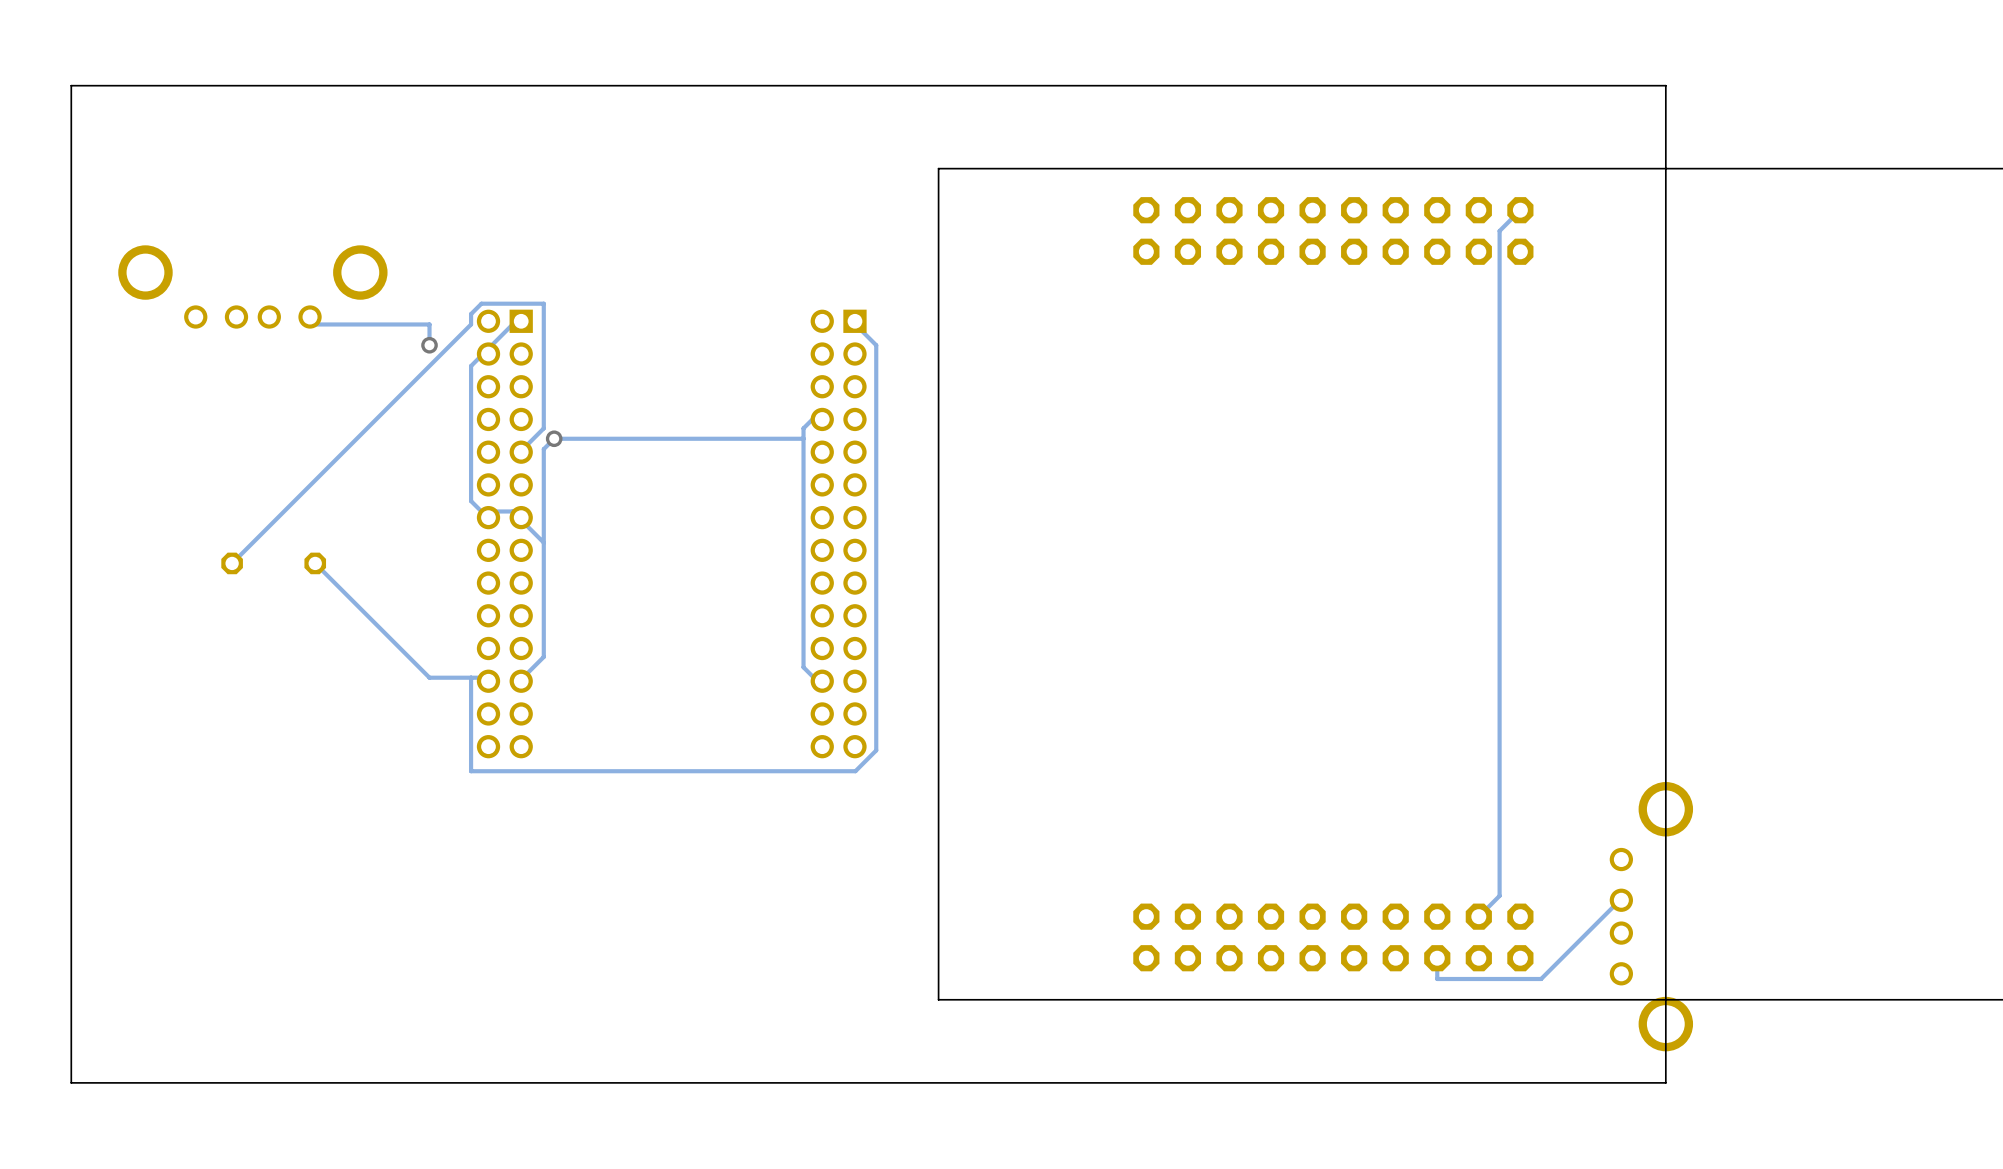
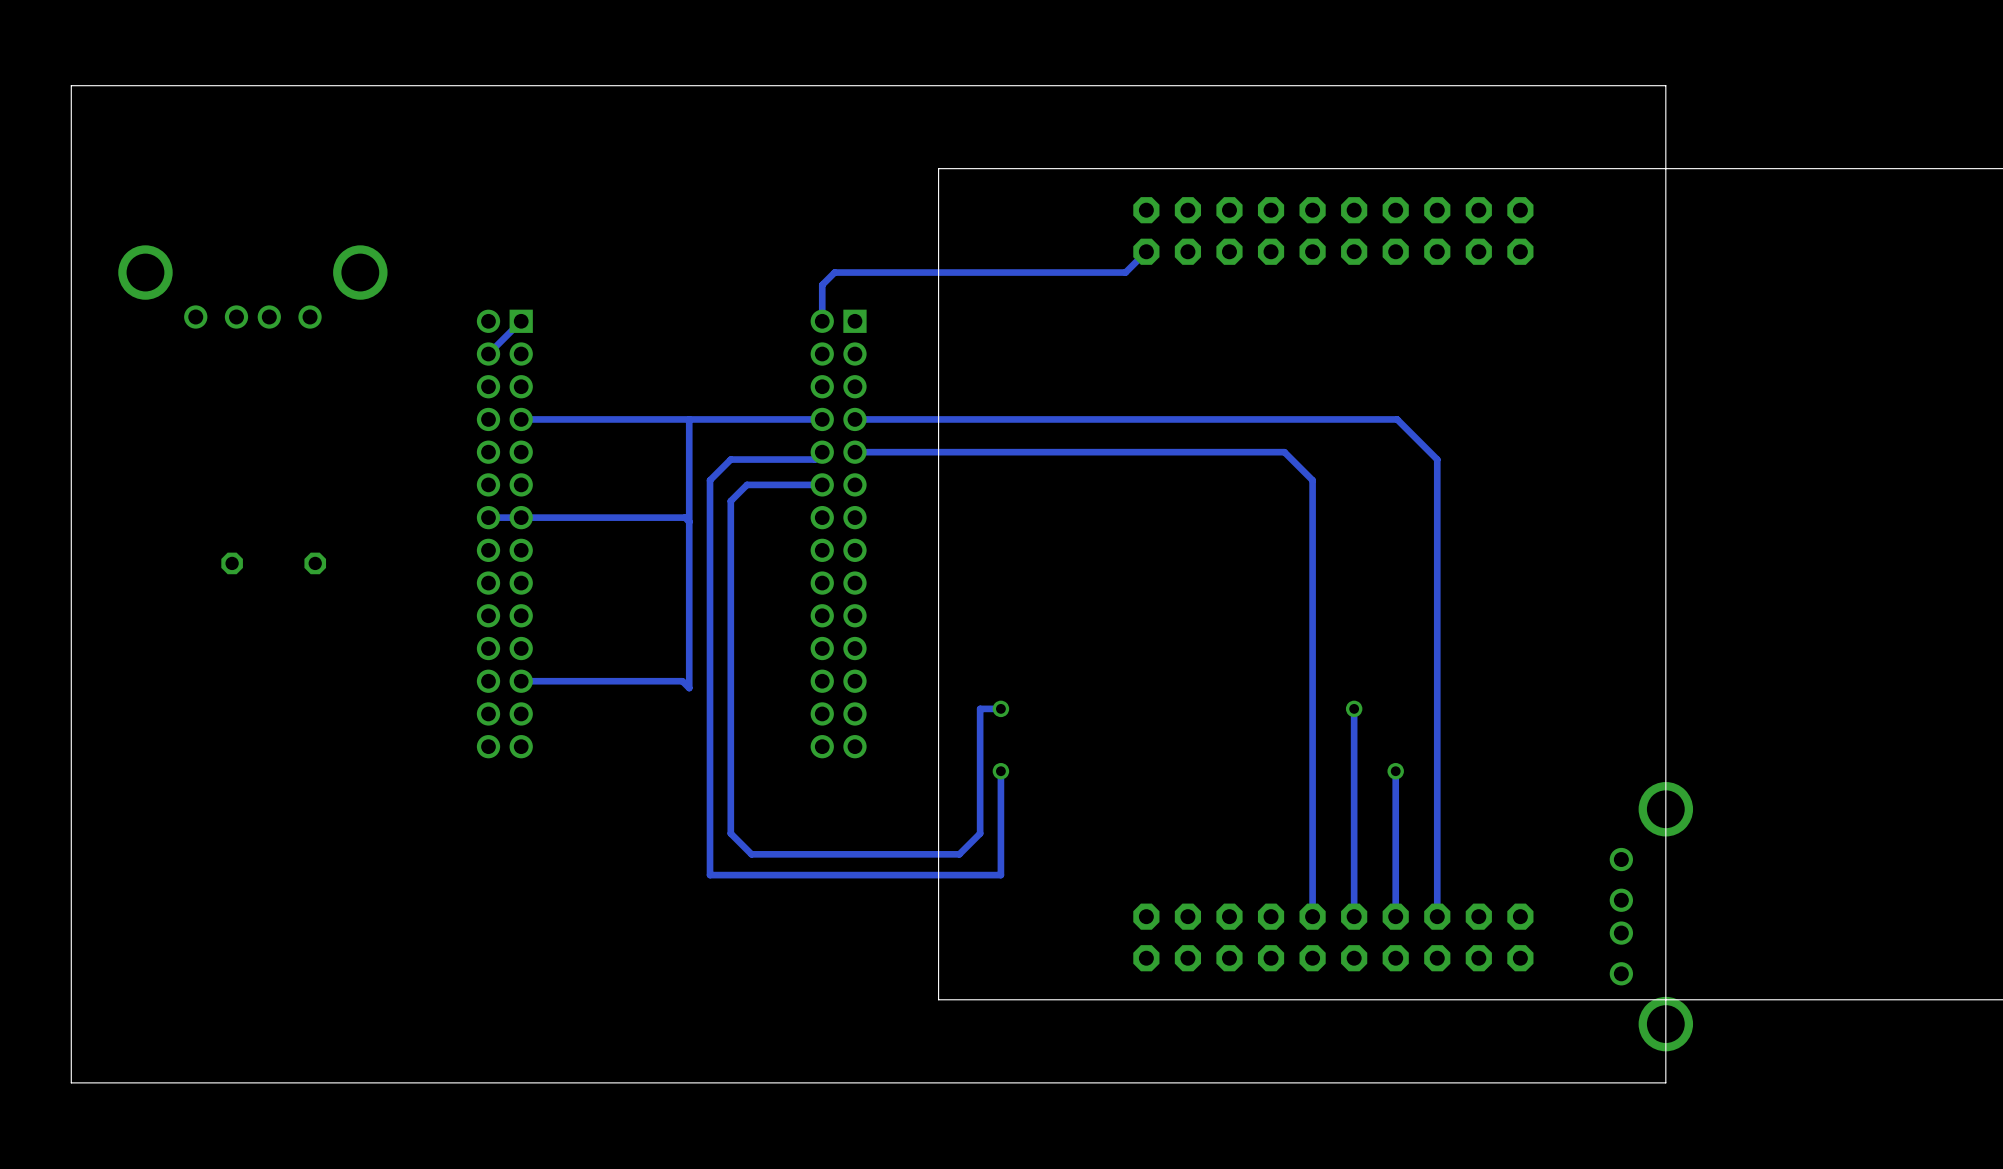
track: (1520, 210) (1499, 230) (1499, 895) (1478, 916) -> none
track: none -> (1146, 251) (1125, 272) (834, 272) (822, 284) (822, 321)
track: (310, 317) (315, 324) (429, 324) (429, 345) -> none
track: (521, 321) (512, 324) (491, 345) (488, 354) (481, 355) (471, 366) (471, 501) (488, 517) (491, 511) (512, 511) (521, 517) (523, 521) (543, 542) -> (521, 321) (488, 354)
track: (854, 321) (855, 324) (876, 345) (876, 750) (855, 771) (471, 771) (471, 677) -> none
via: (429, 345) -> none
track: (822, 419) (813, 417) (803, 428) (803, 667) (813, 677) (822, 681) -> (822, 419) (521, 419)
track: none -> (854, 419) (1397, 419) (1437, 459) (1437, 916)
via: (554, 438) -> none
track: (803, 438) (554, 438) (543, 449) (543, 656) (521, 681) -> (689, 419) (689, 688) (682, 681) (521, 681)
track: (521, 452) (543, 428) (543, 303) (481, 303) (471, 314) (471, 324) (232, 563) -> none
track: none -> (822, 452) (814, 459) (730, 459) (710, 480) (710, 875) (1000, 875) (1000, 771)
track: none -> (854, 452) (1284, 452) (1312, 480) (1312, 916)
track: none -> (822, 484) (746, 484) (730, 501) (730, 833) (751, 854) (959, 854) (980, 833) (980, 708) (1000, 708)
track: none -> (488, 517) (684, 517) (689, 521)
track: (315, 563) (429, 677) (481, 677) (488, 681) -> none
via: none -> (1000, 708)
track: none -> (1354, 708) (1354, 916)
via: none -> (1354, 708)
via: none -> (1000, 771)
track: none -> (1395, 771) (1395, 916)
via: none -> (1395, 771)
track: (1621, 900) (1541, 979) (1437, 979) (1437, 958) -> none

